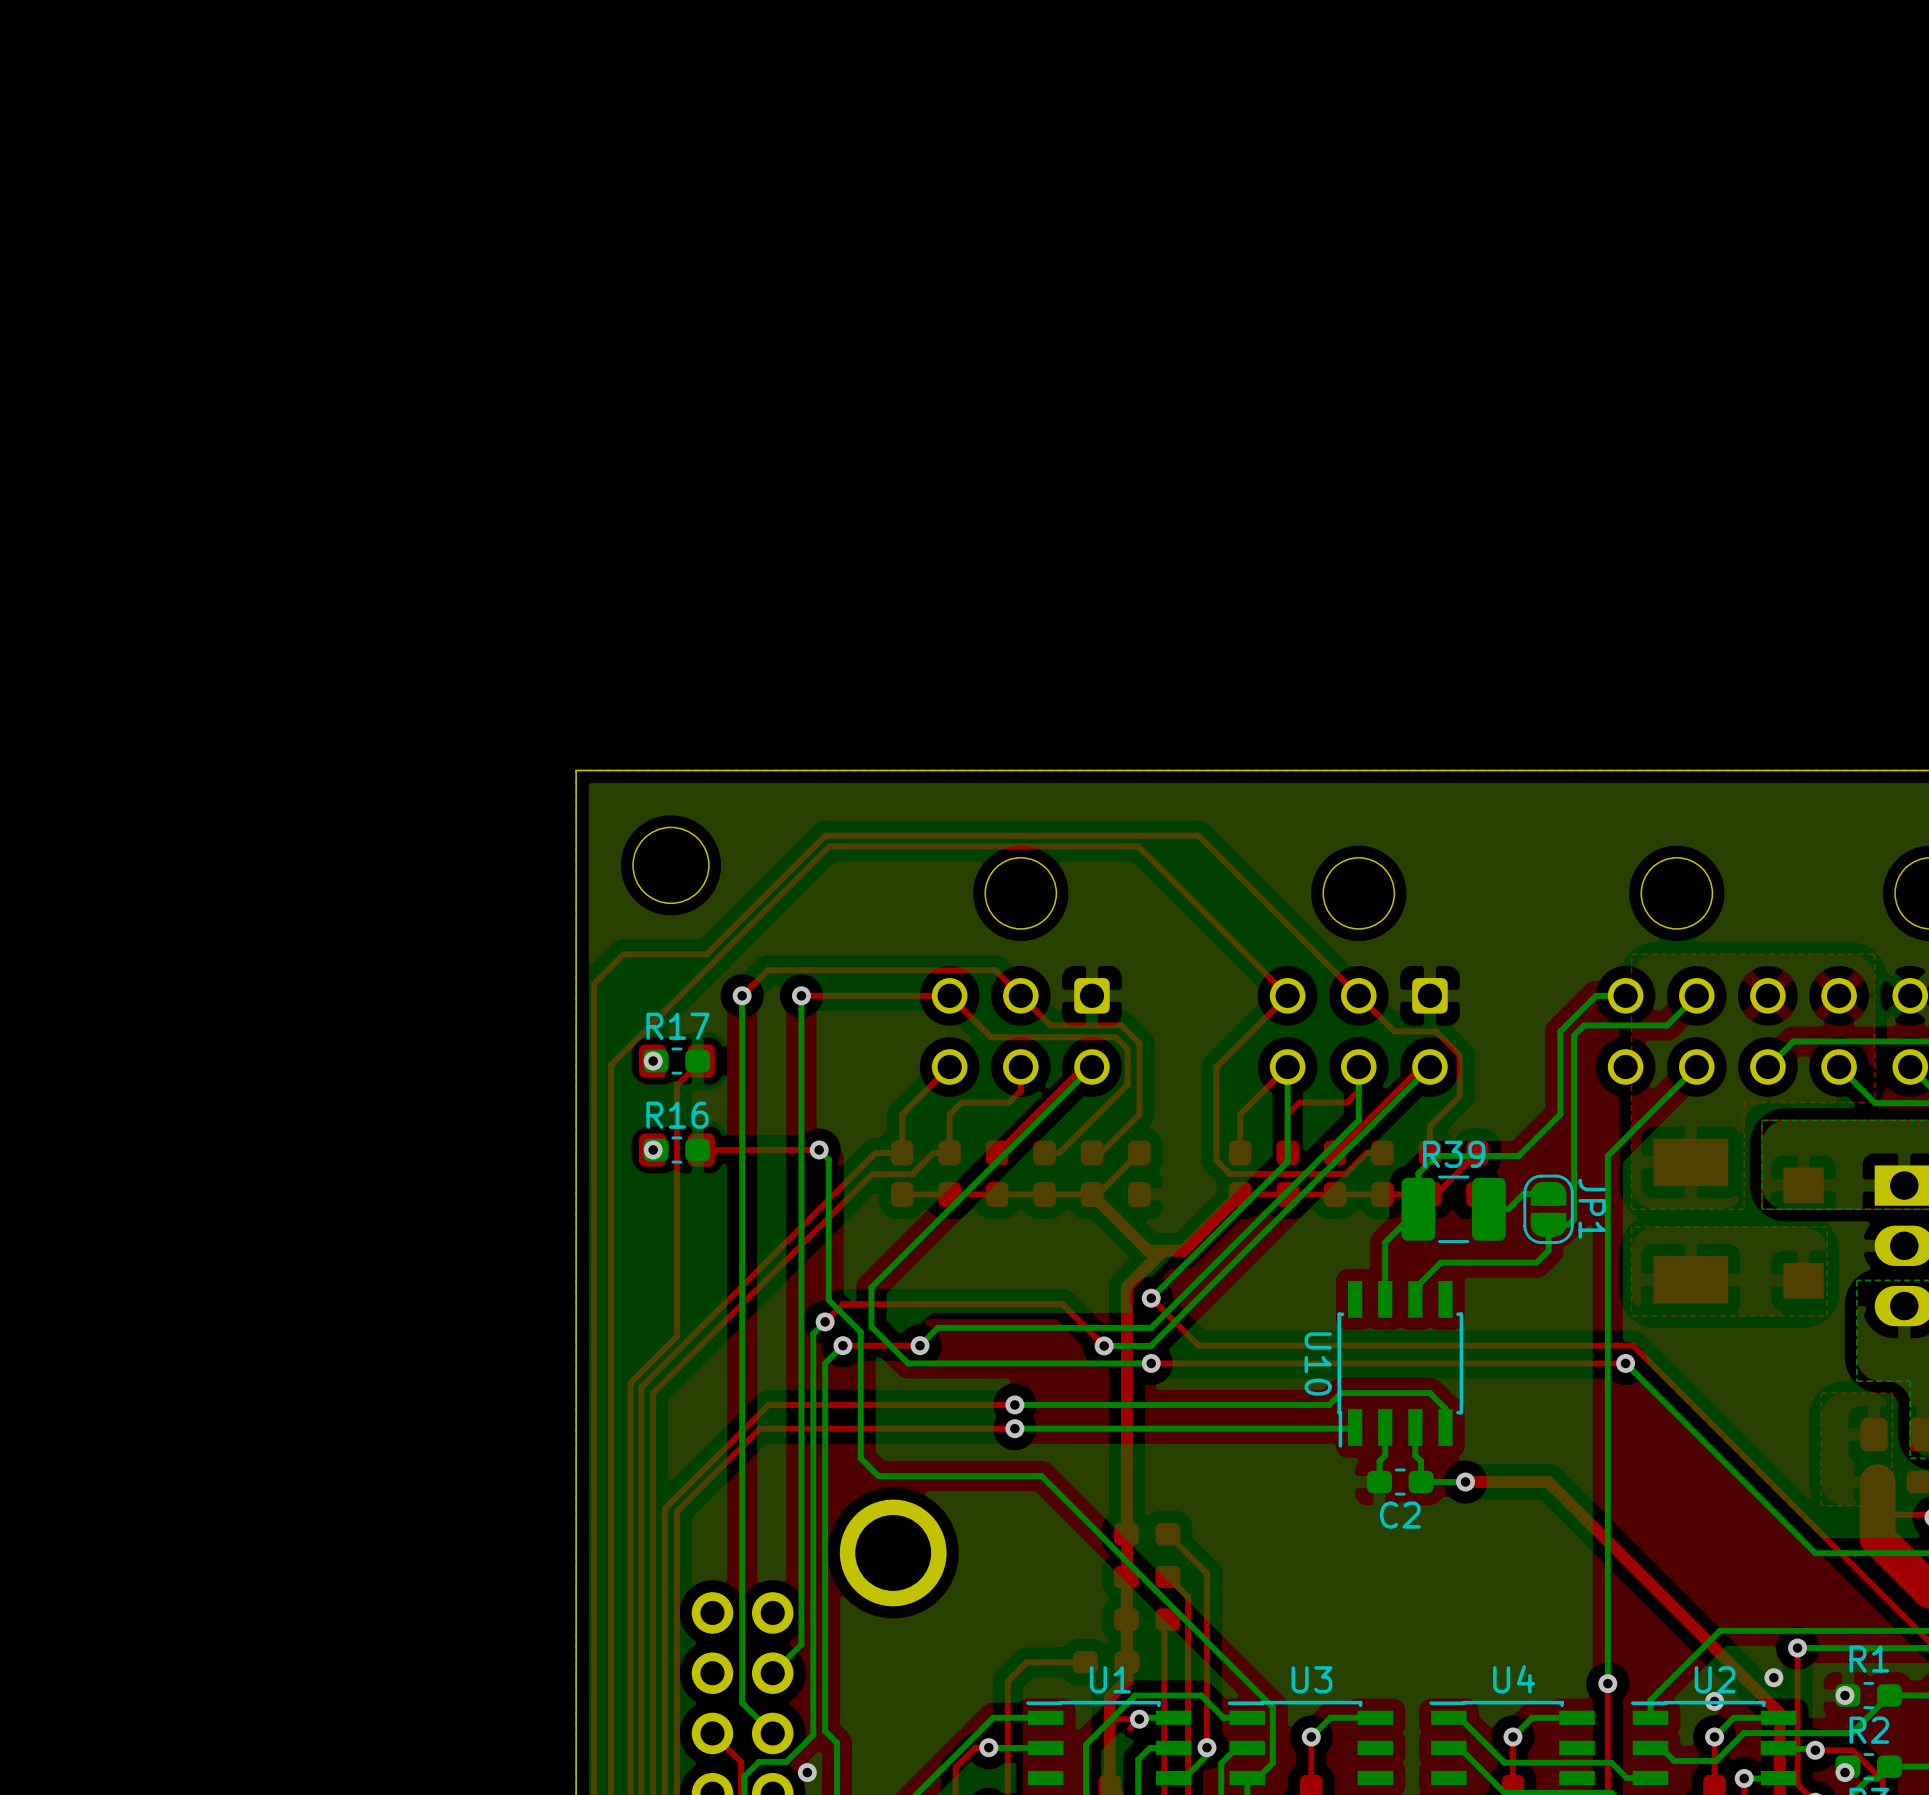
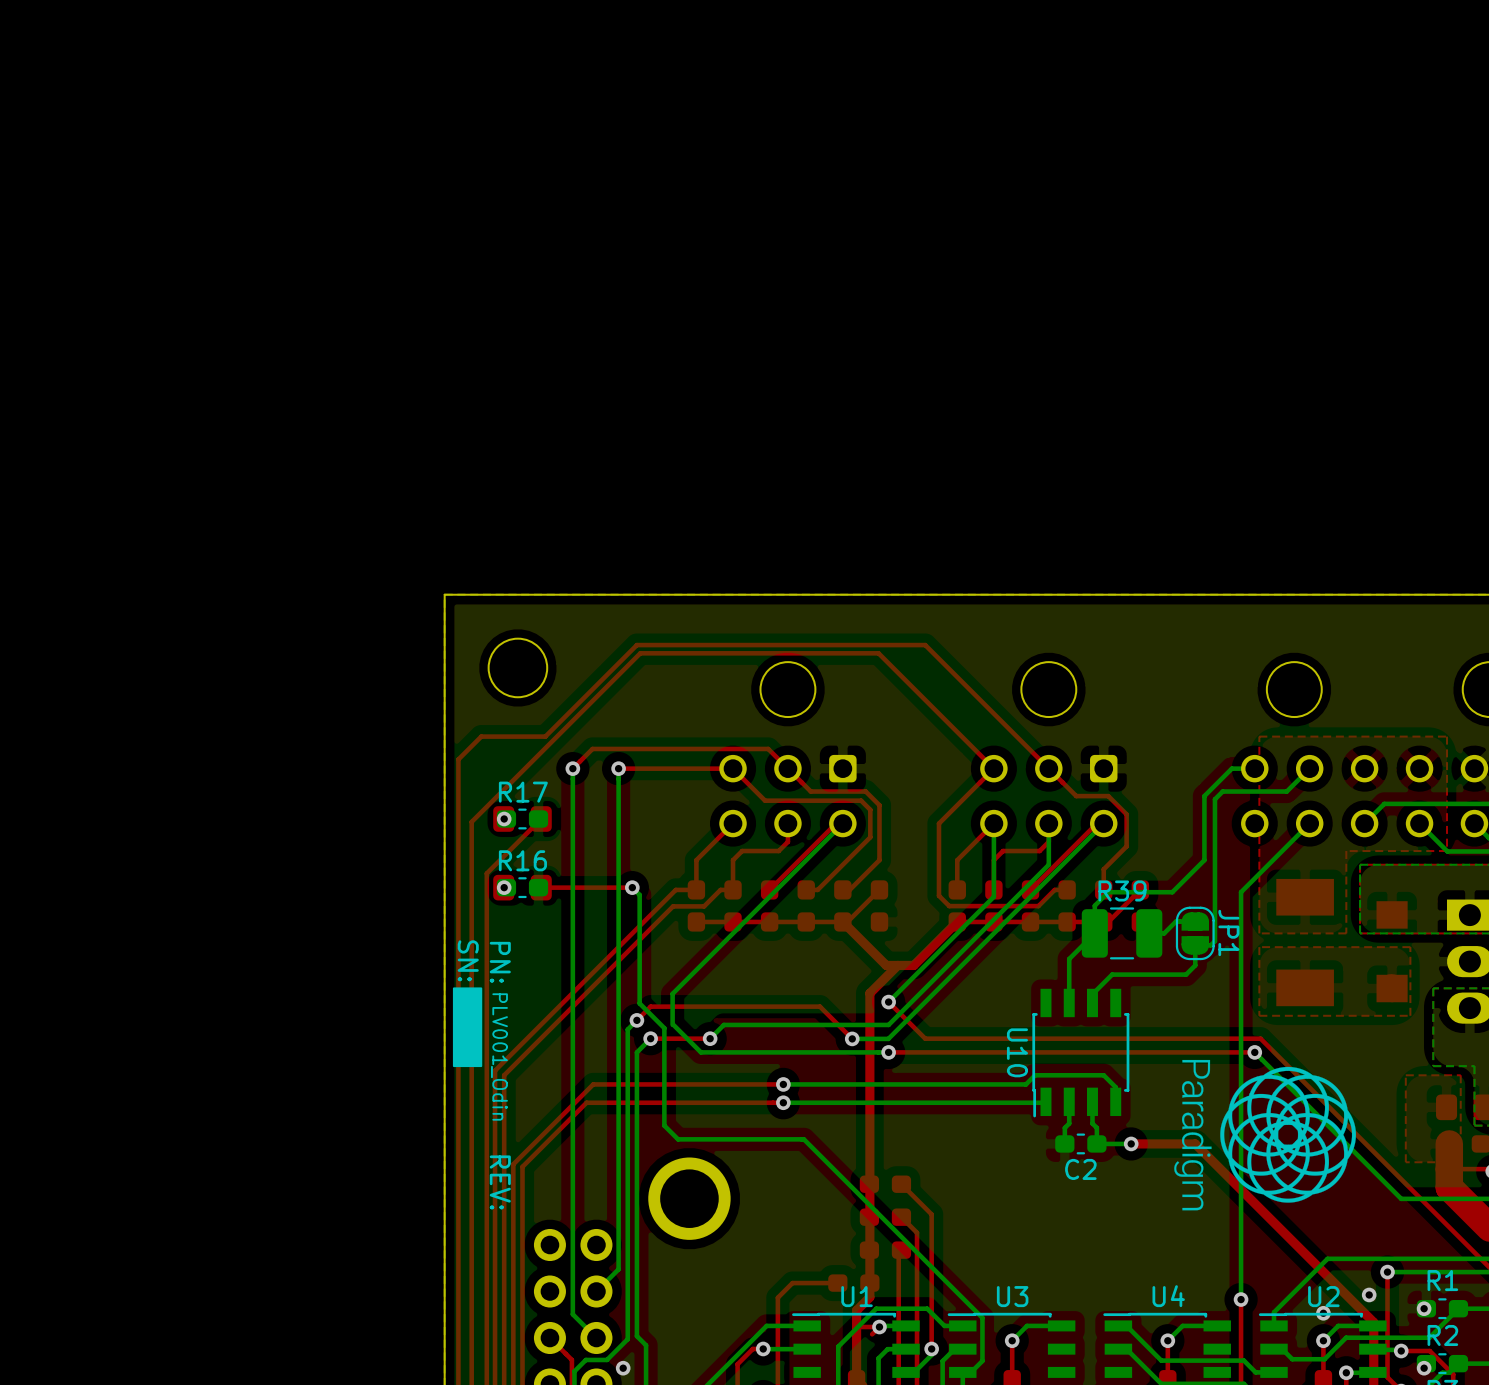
top track: (676, 1085) (676, 1336) (630, 1382) -> (522, 837) (486, 873) (486, 1067)
drawing: none -> [452, 987, 483, 1068]
text: none -> PLV001_Odin (499, 1056)
drawing: none -> [1174, 1059, 1357, 1211]

